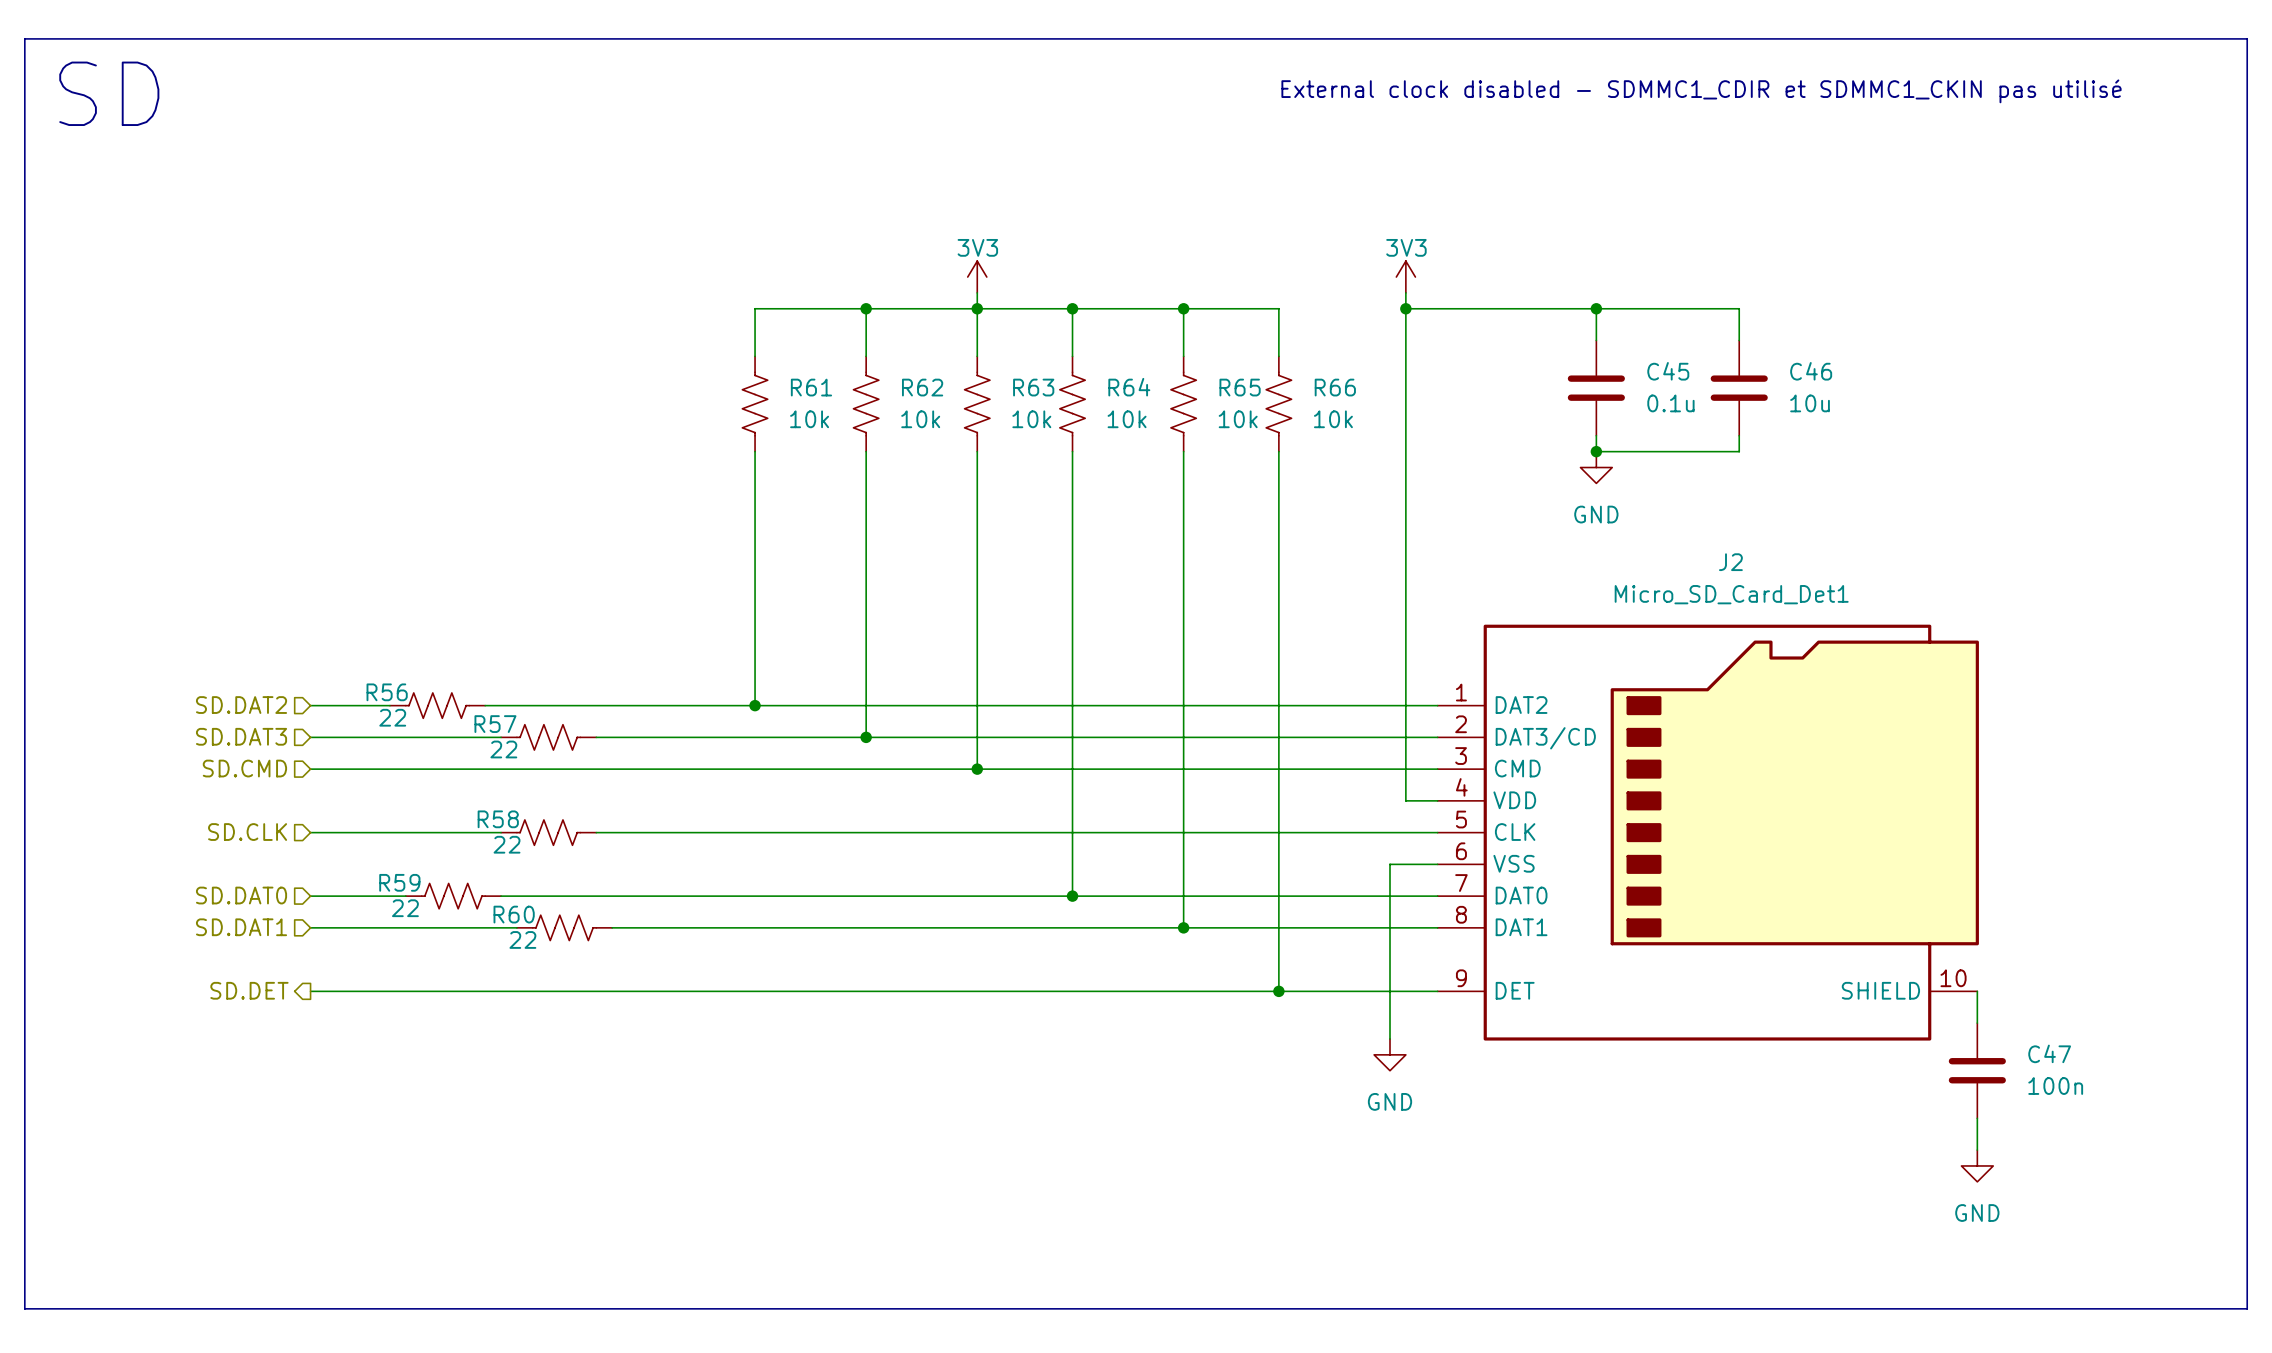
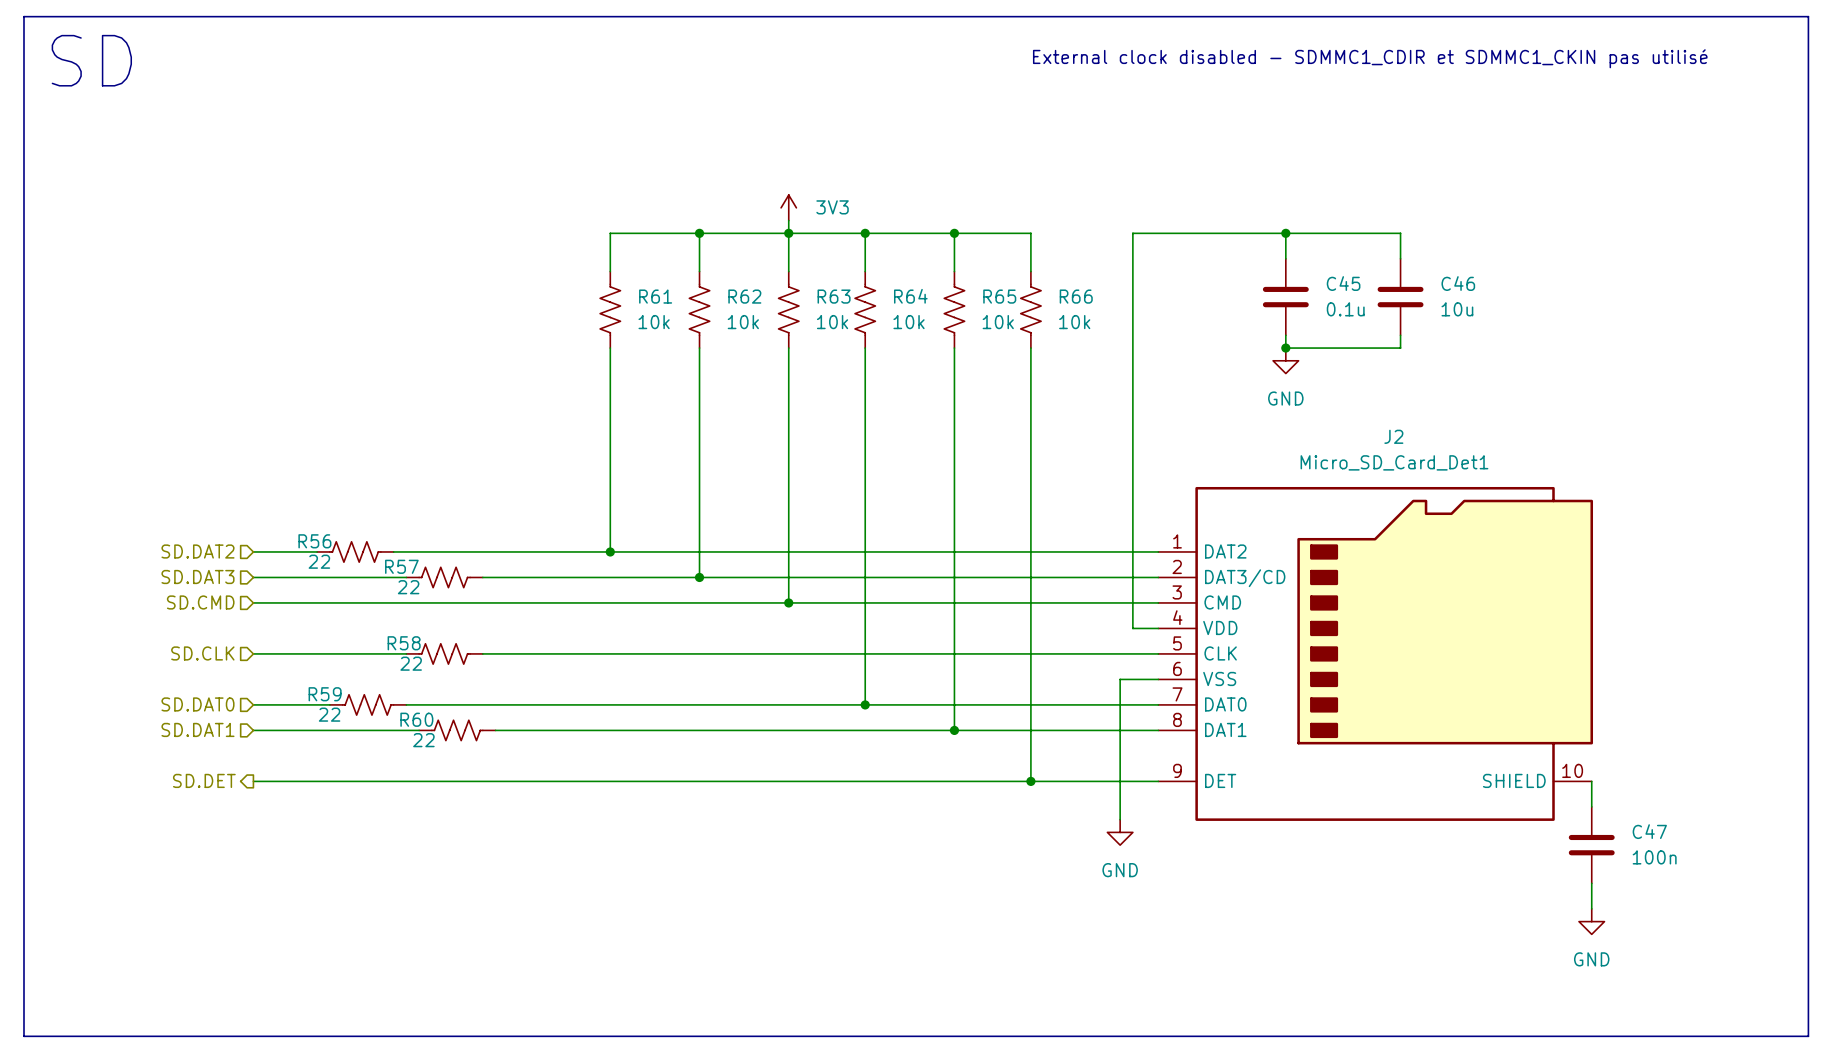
power symbol text position: 3V3 (977, 247) -> 3V3 (832, 207)
power symbol: 3V3 (1405, 277) -> none
wire: (1405, 292) (1405, 308) -> none
junction: (1405, 308) -> none

